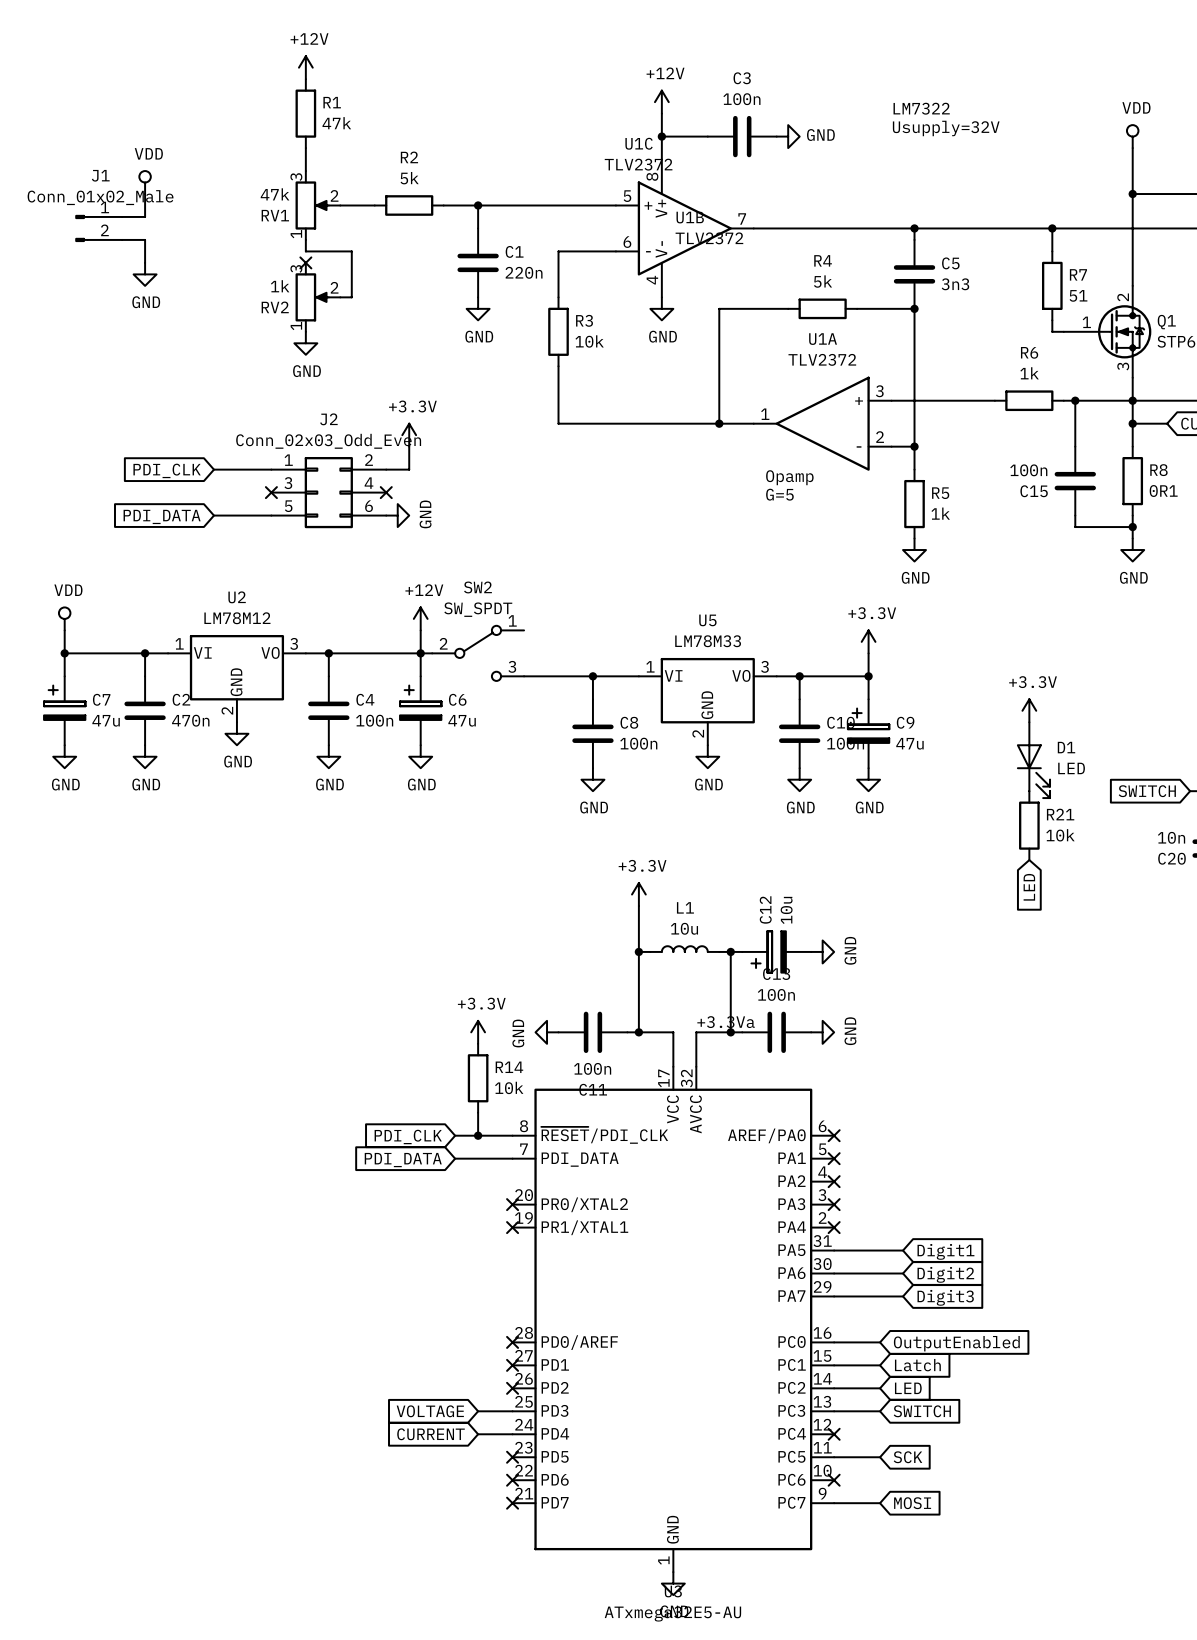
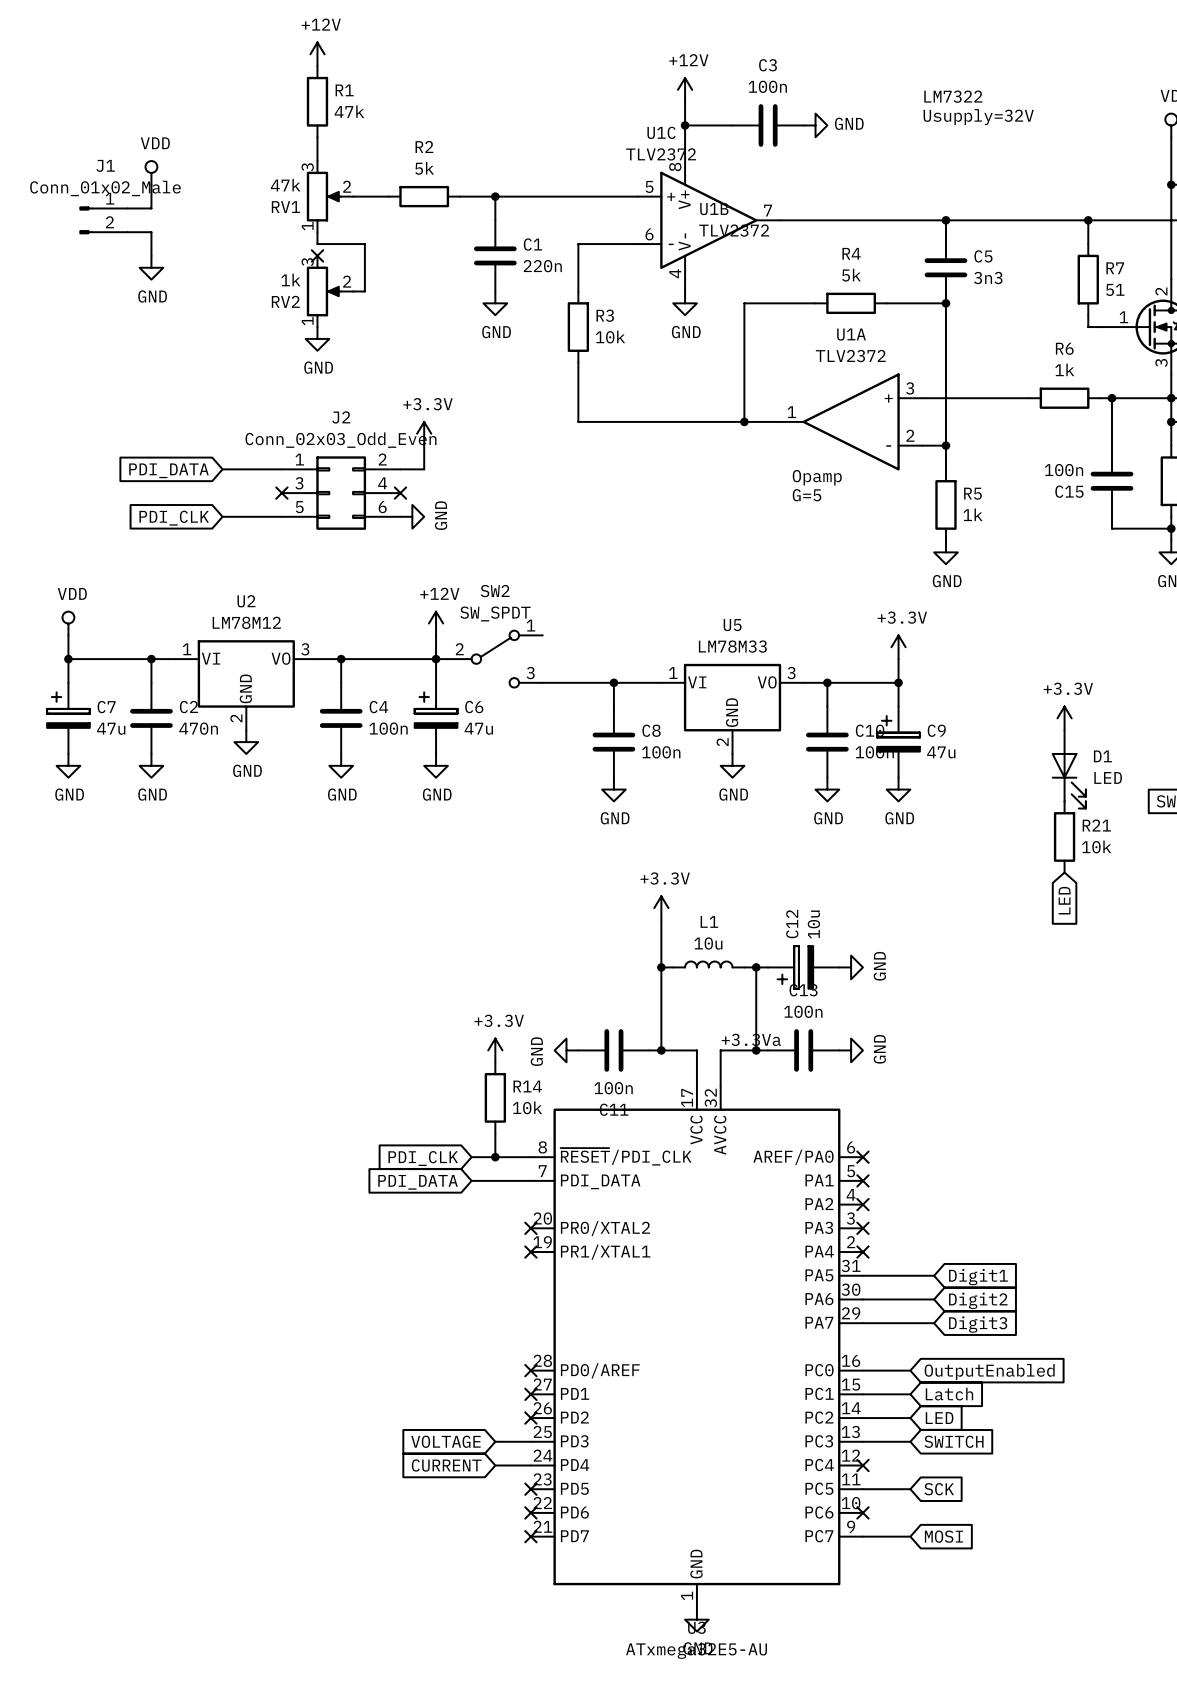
global label: PDI_CLK (167, 470) -> PDI_DATA (168, 470)
global label: PDI_DATA (162, 516) -> PDI_CLK (174, 518)

